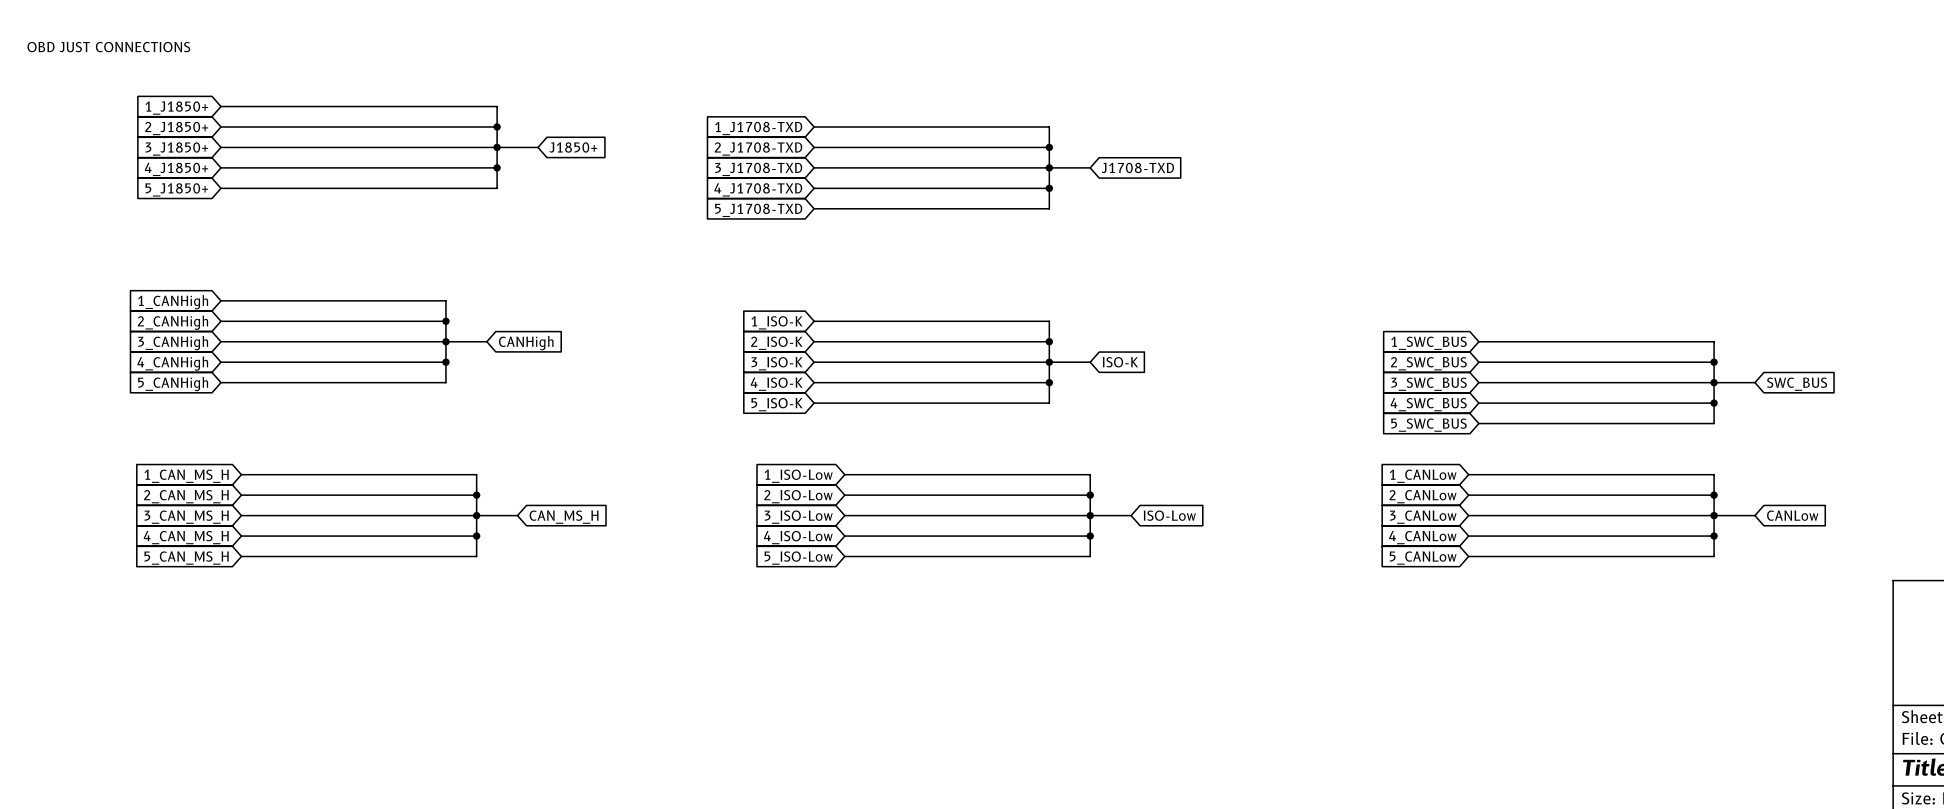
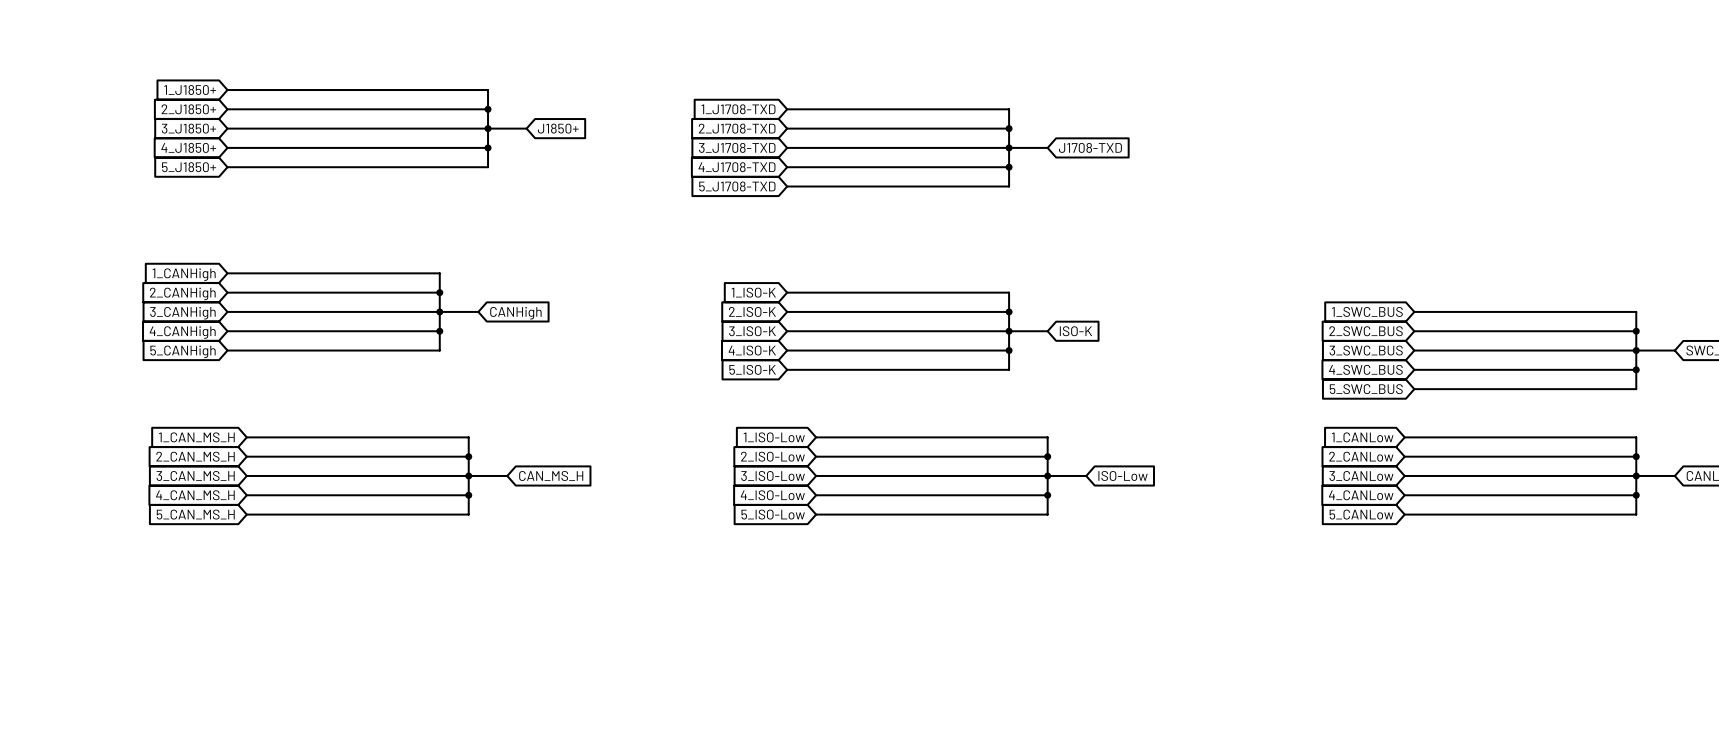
text: OBD JUST CONNECTIONS (108, 47) -> none

